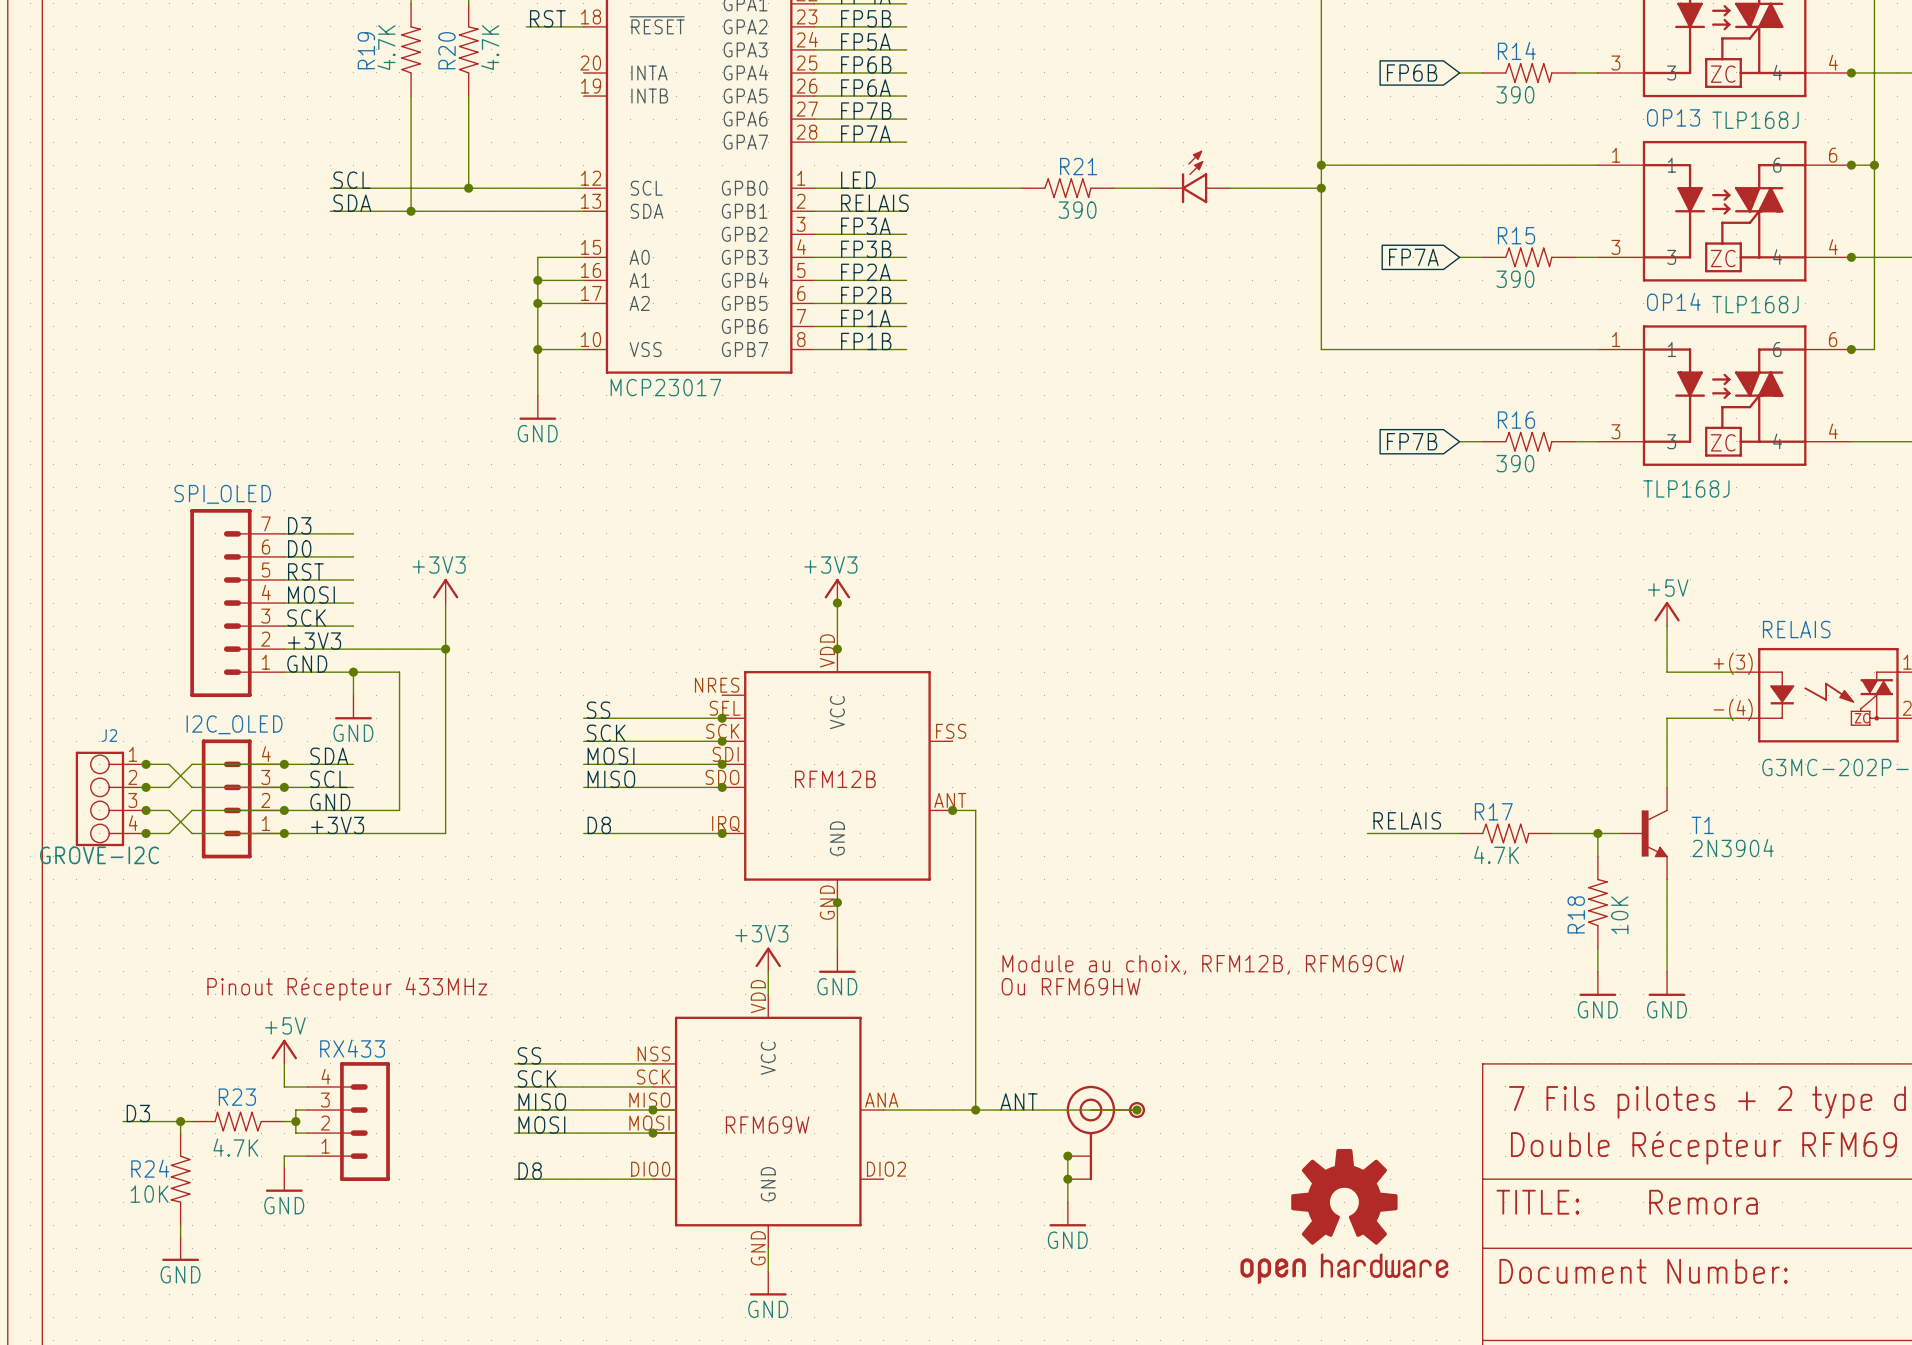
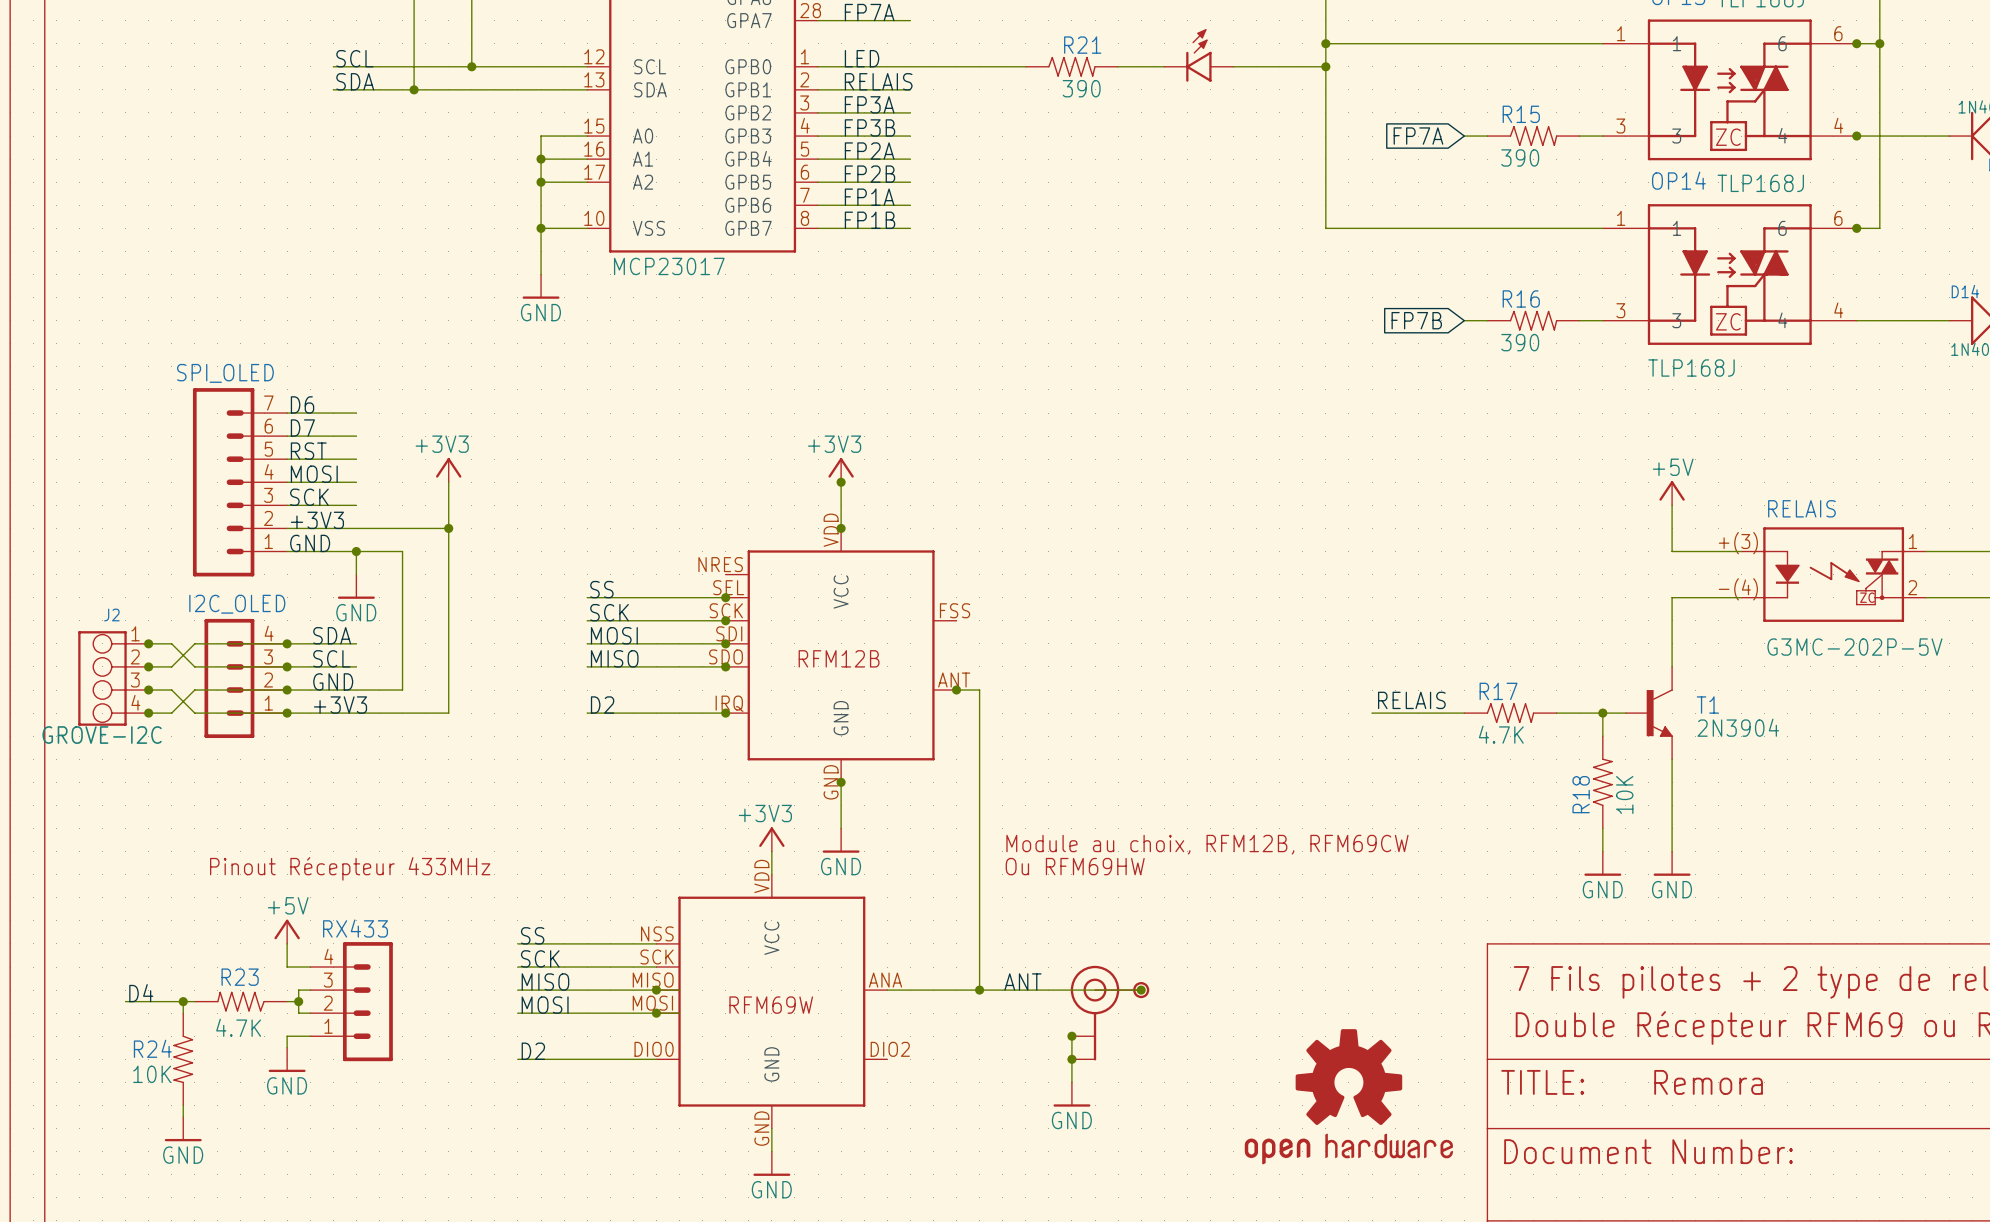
label: D3 (299, 525) -> D6 (302, 404)
label: D0 (299, 548) -> D7 (302, 428)
label: D8 (599, 825) -> D2 (602, 705)
label: D3 (138, 1113) -> D4 (141, 993)
label: D8 (530, 1171) -> D2 (533, 1051)

